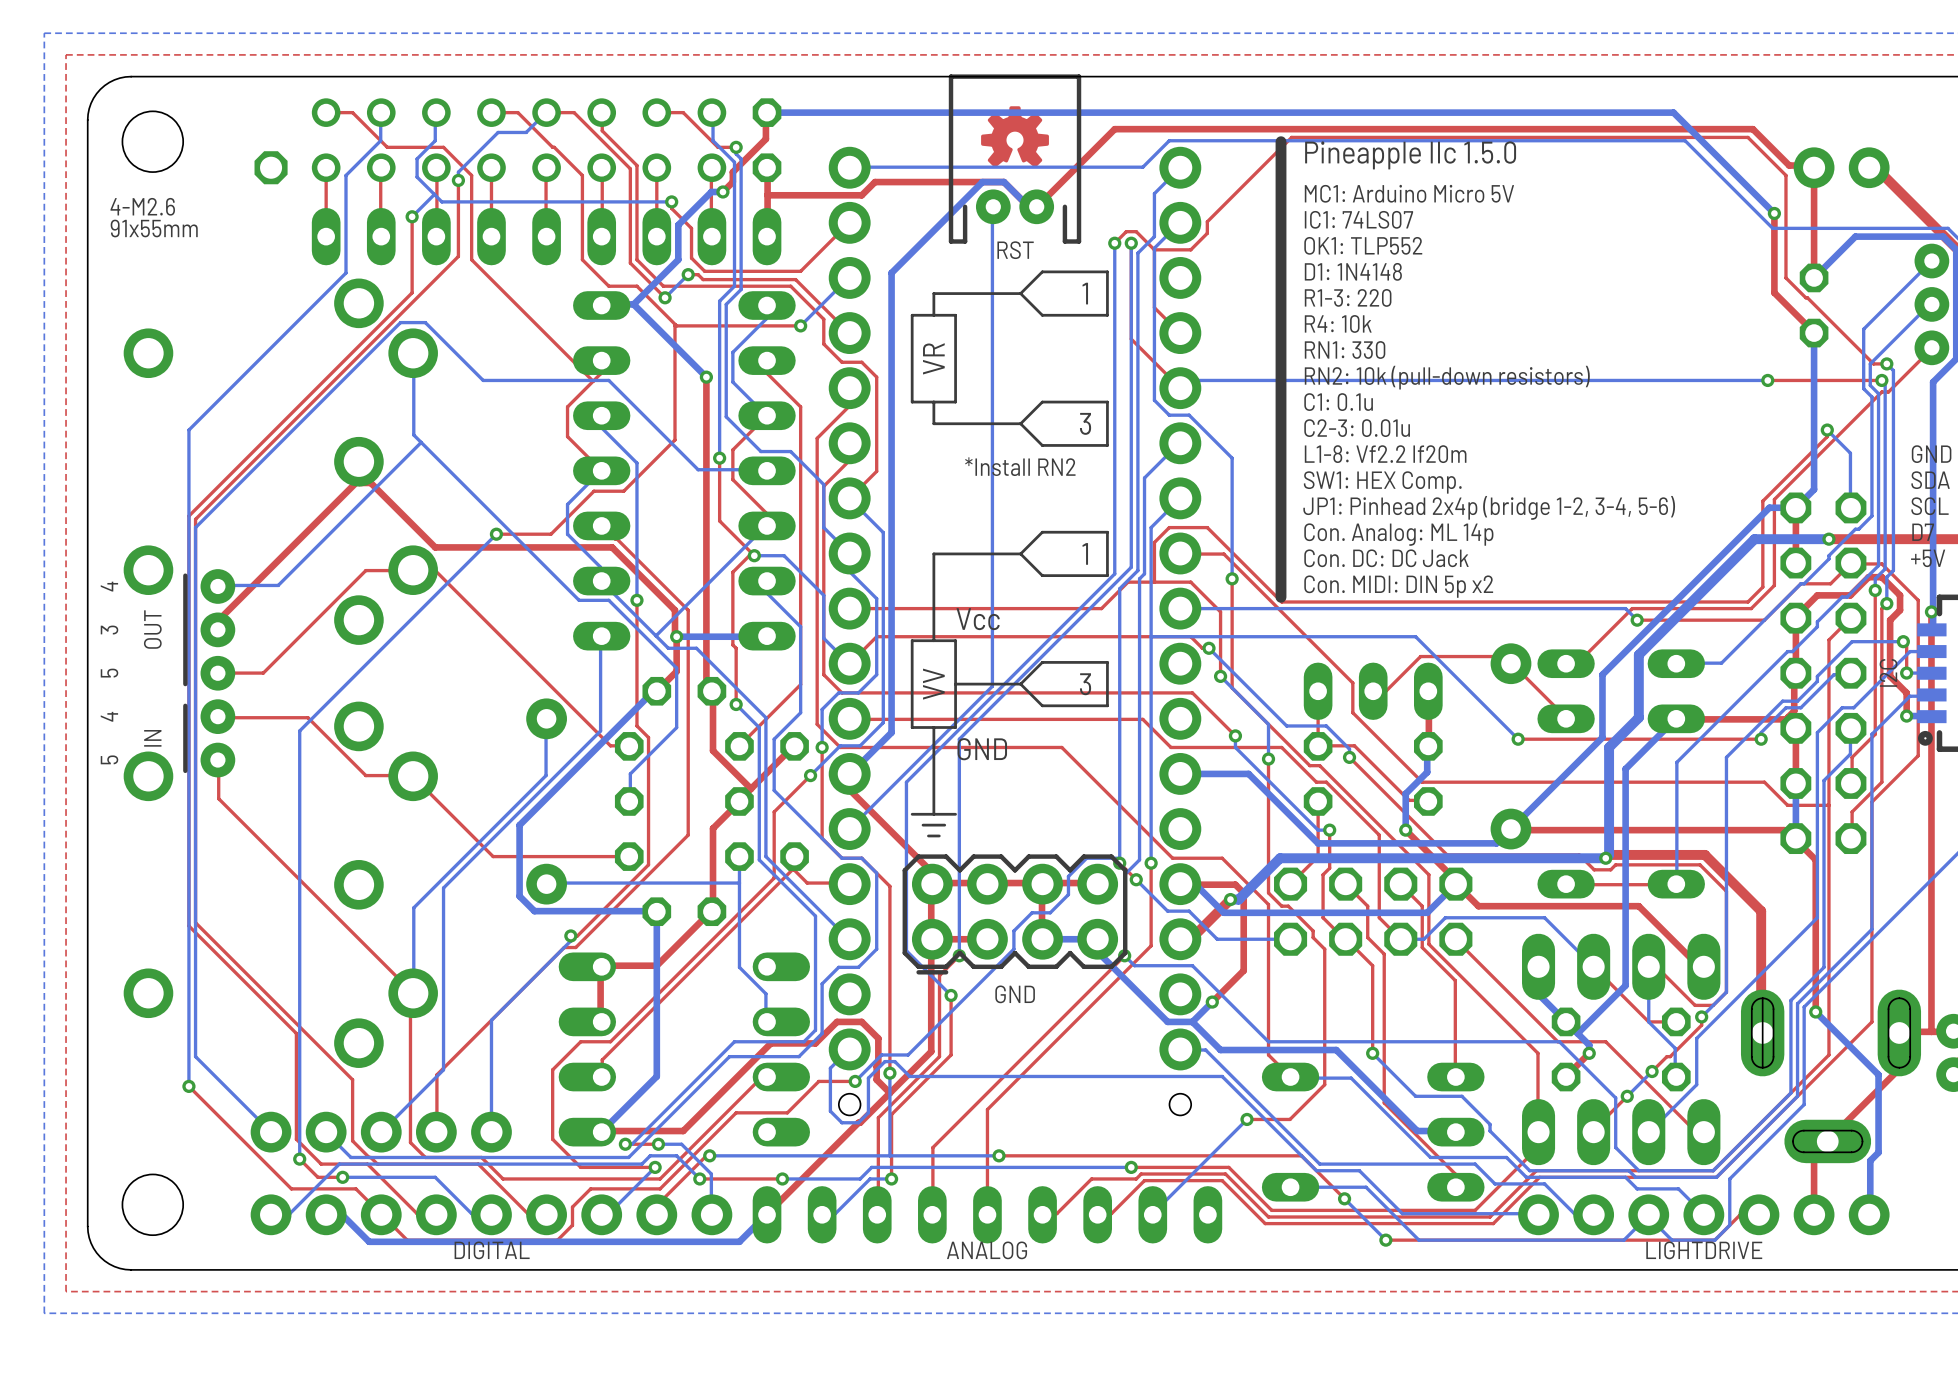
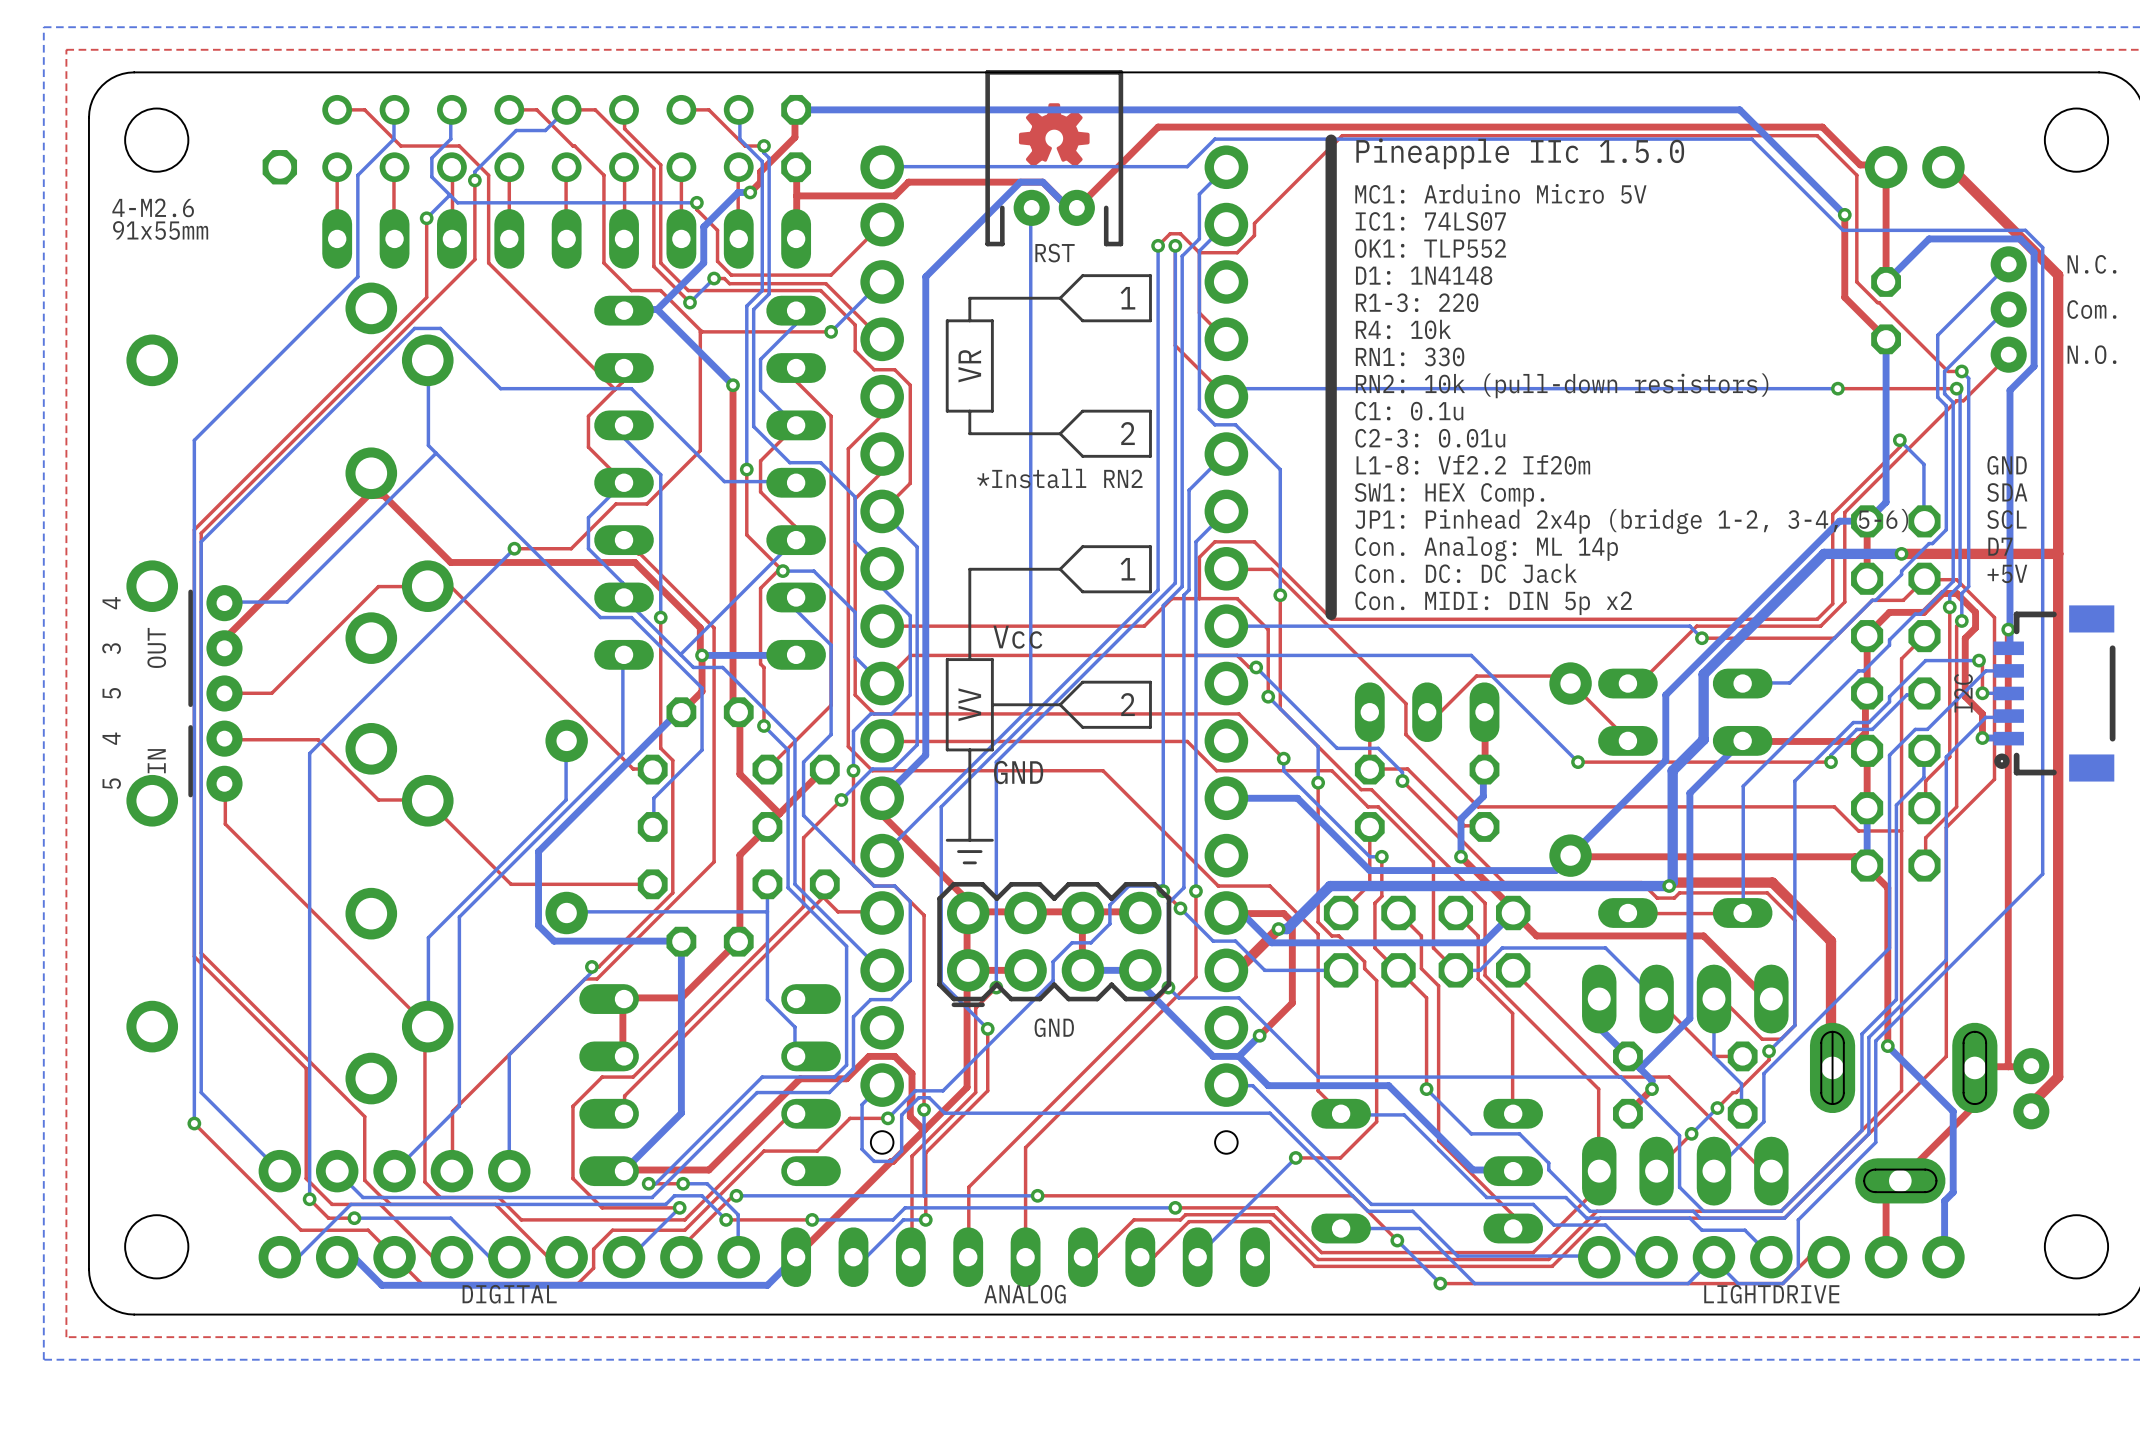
drawing shape: [910, 270, 1109, 838] -> [945, 274, 1152, 865]

